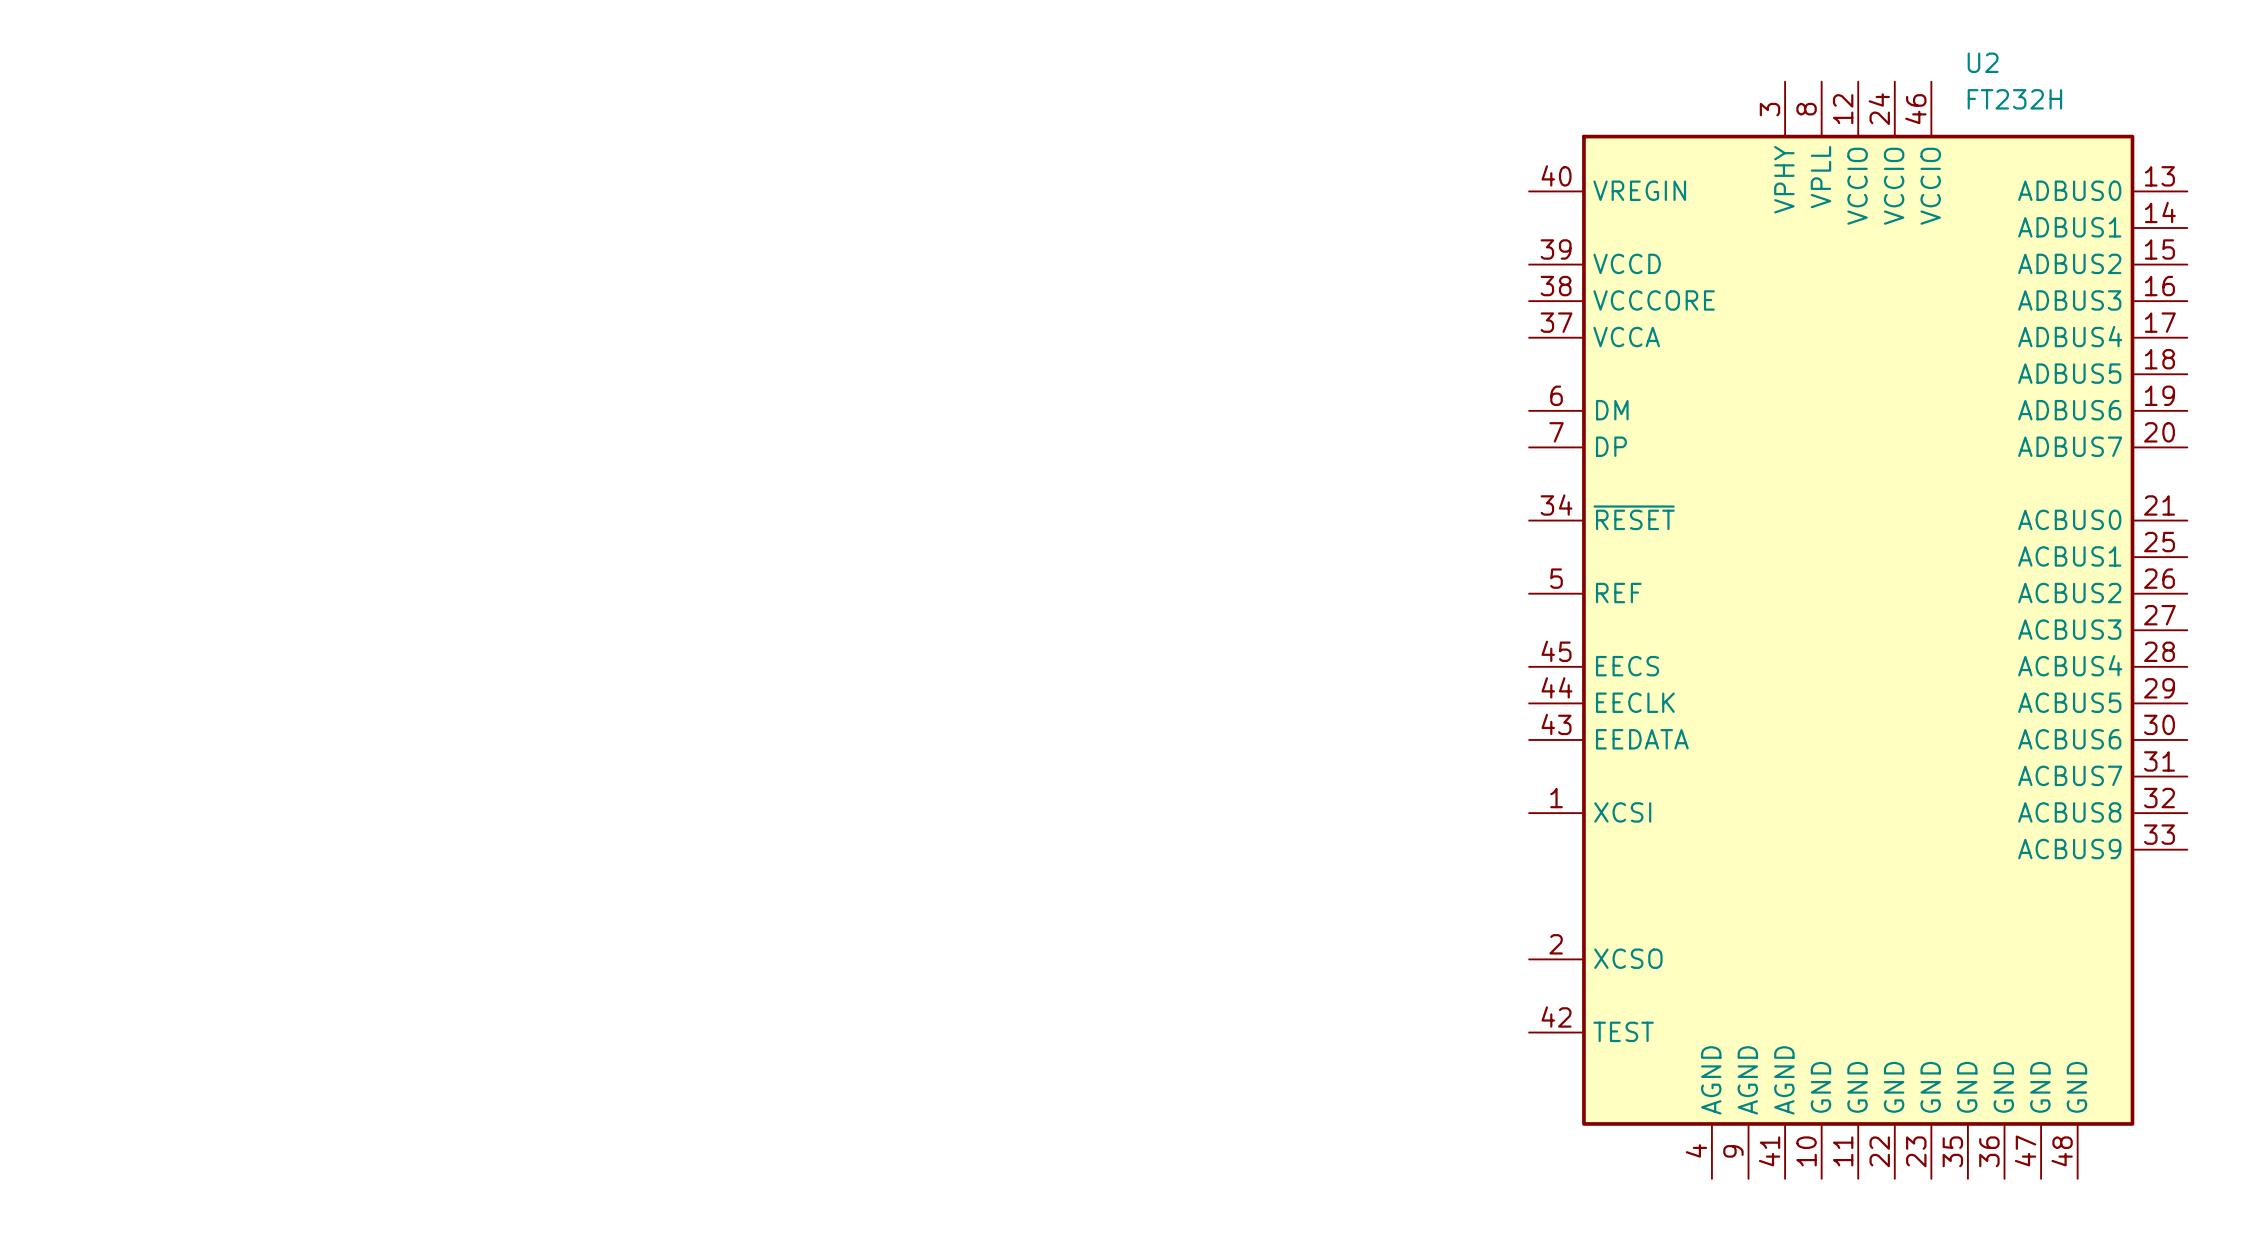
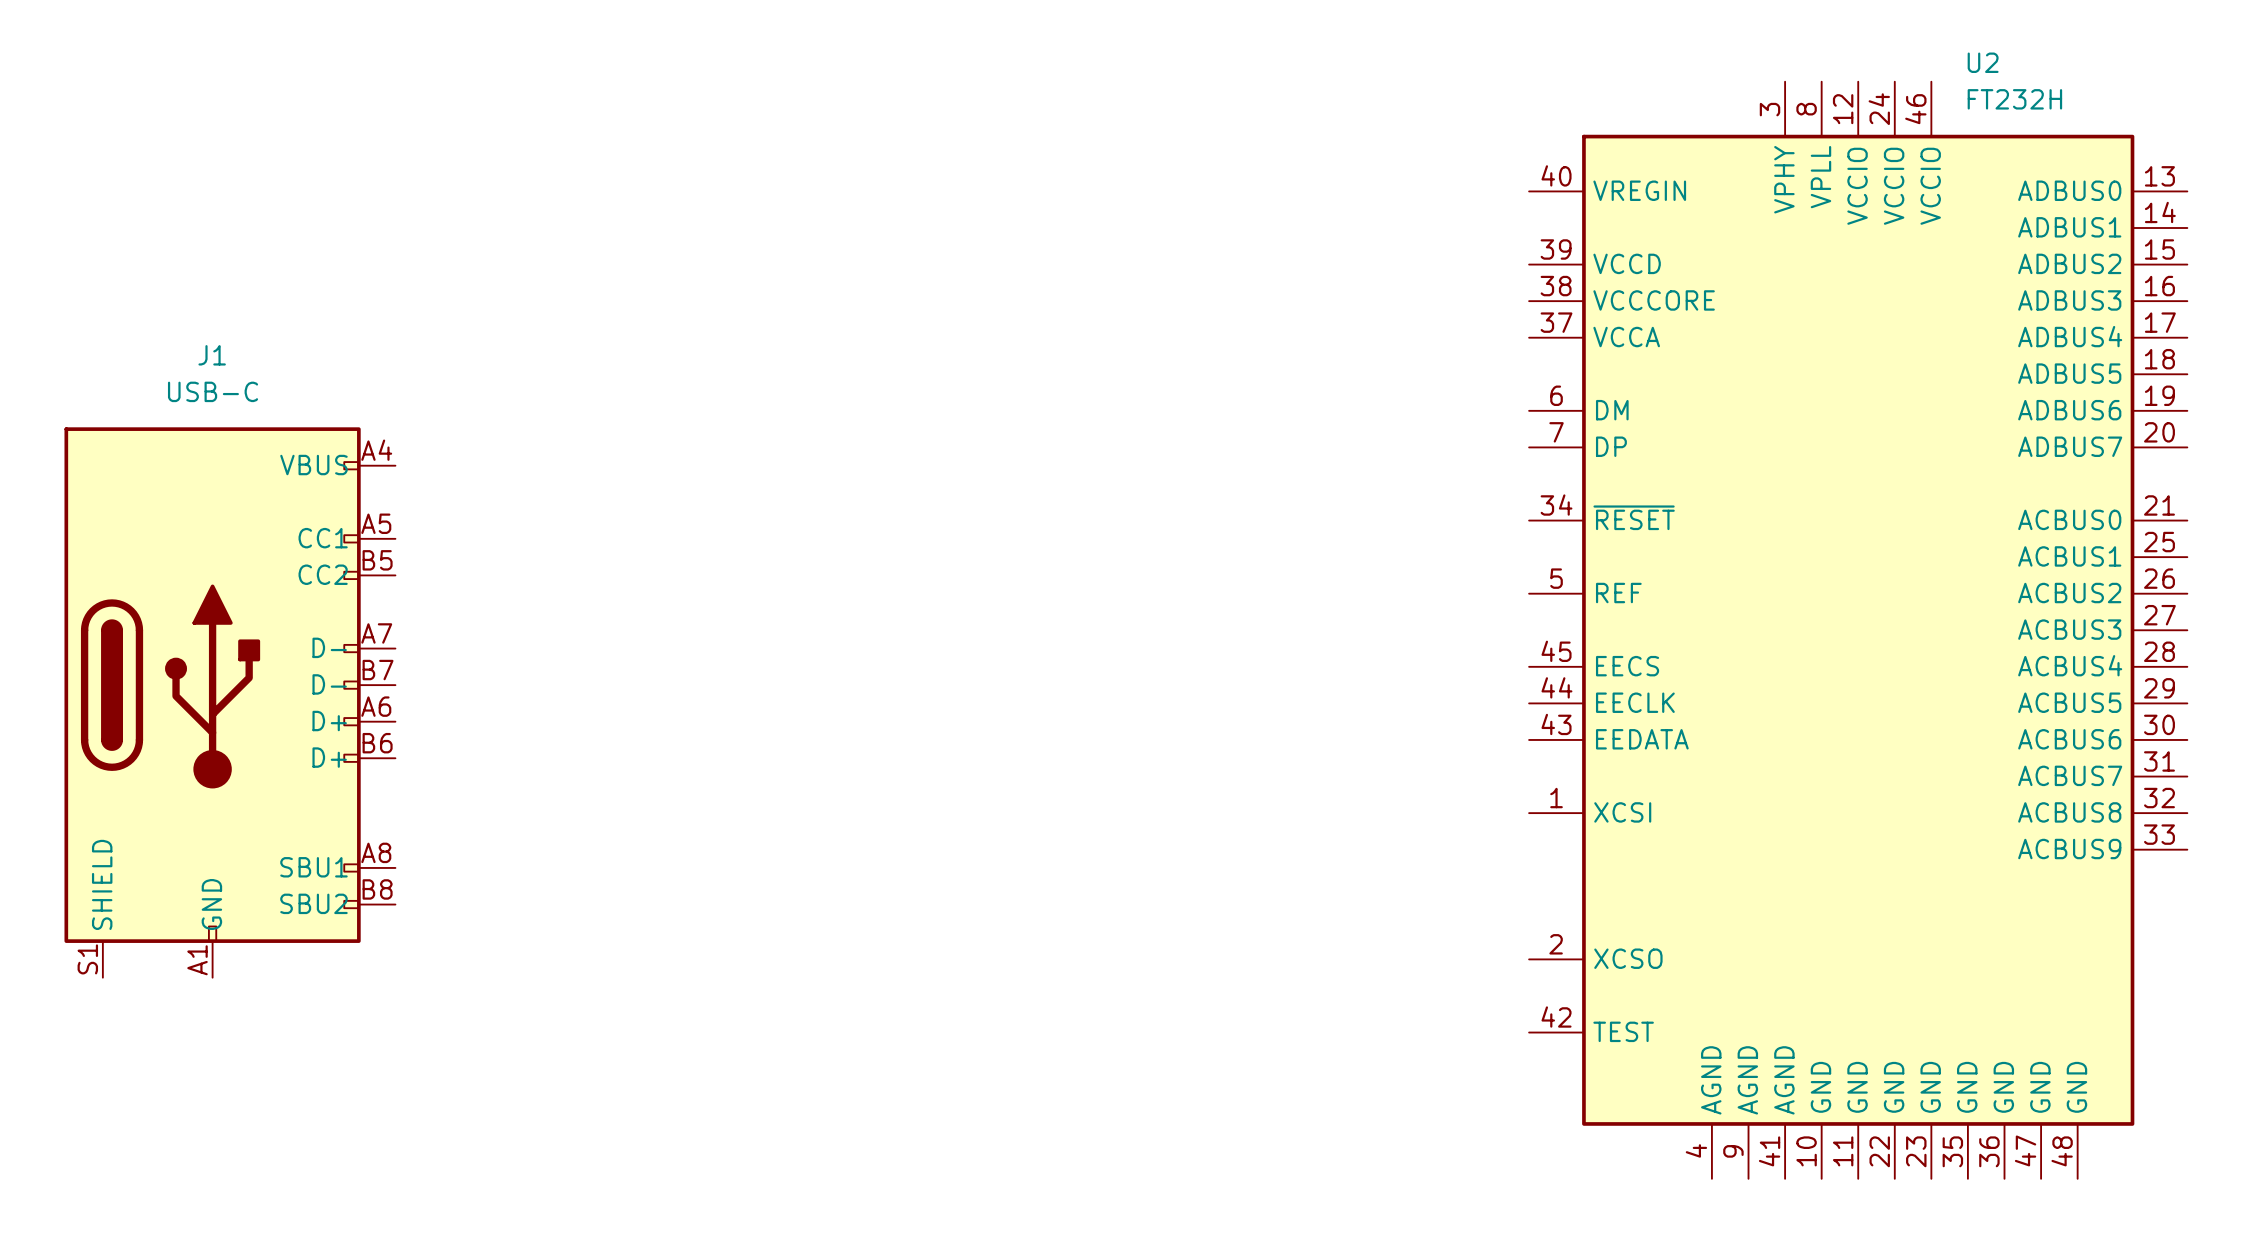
J1: none -> USB-C (229, 702)

